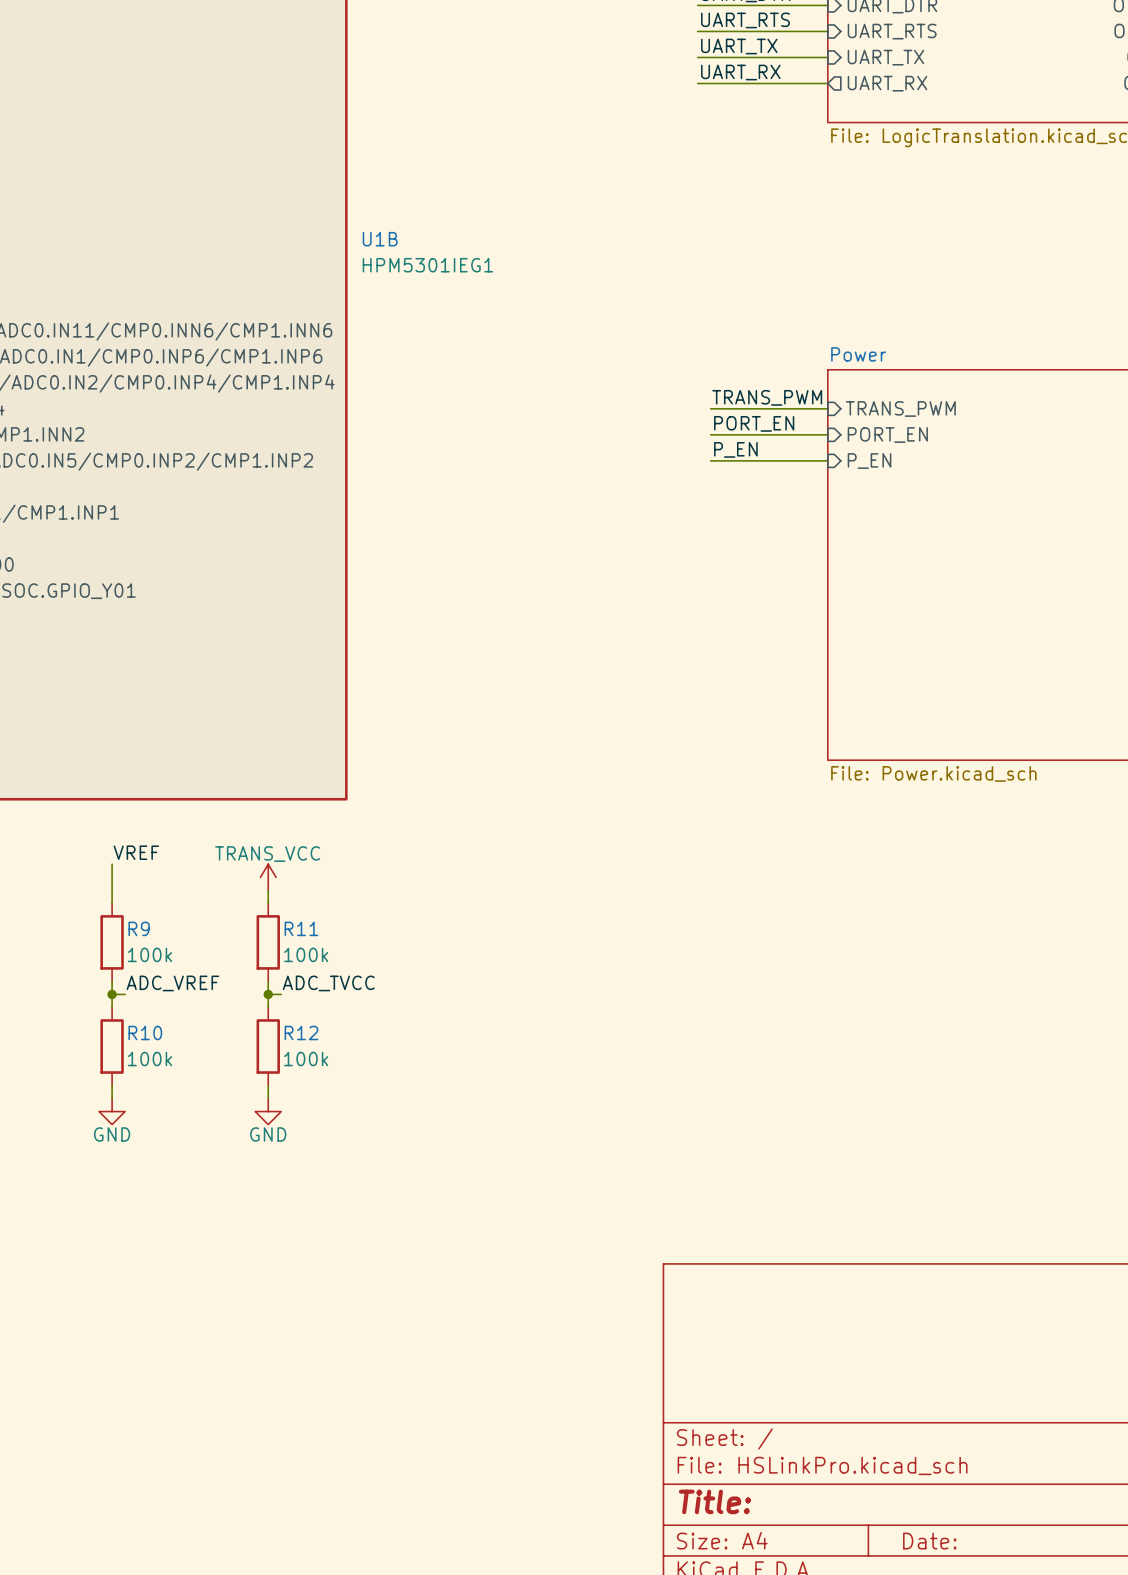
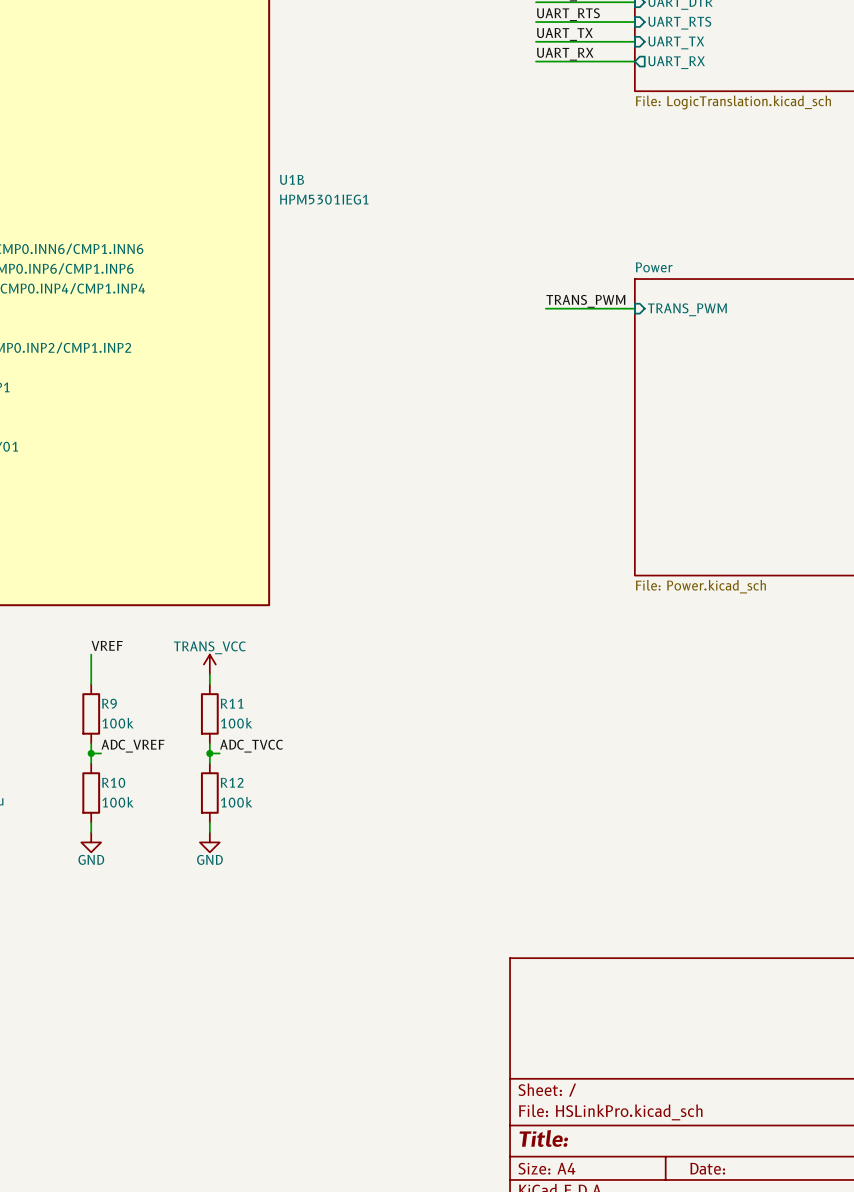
label: PORT_EN (754, 423) -> none
wire: (710, 434) (827, 434) -> none
sheet pin: PORT_EN (887, 435) -> none
label: P_EN (735, 449) -> none
wire: (710, 460) (827, 460) -> none
sheet pin: P_EN (869, 461) -> none

